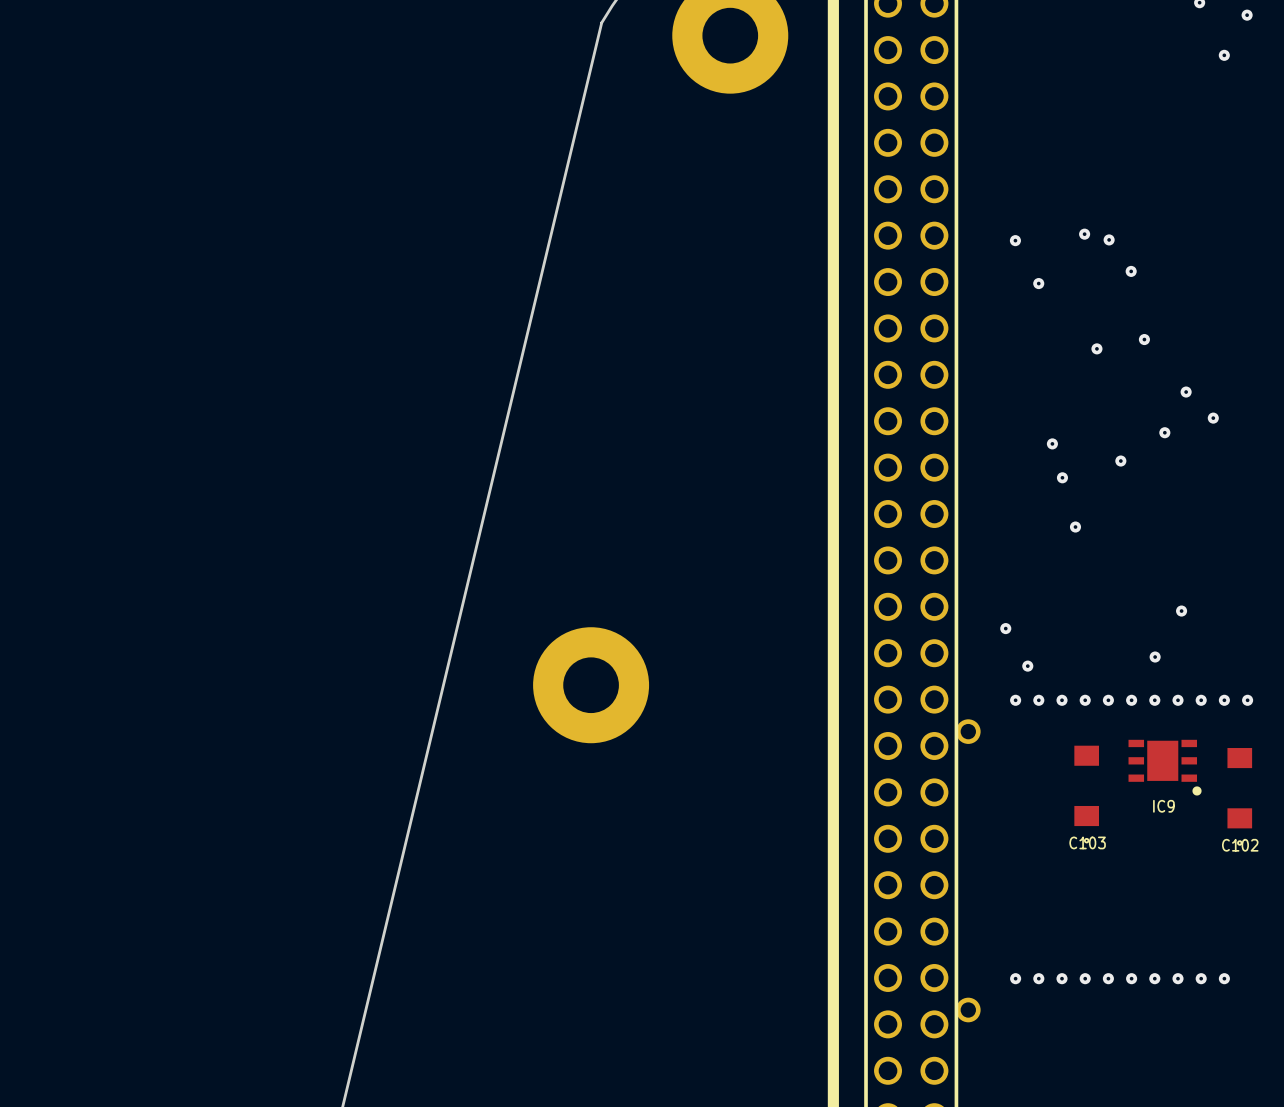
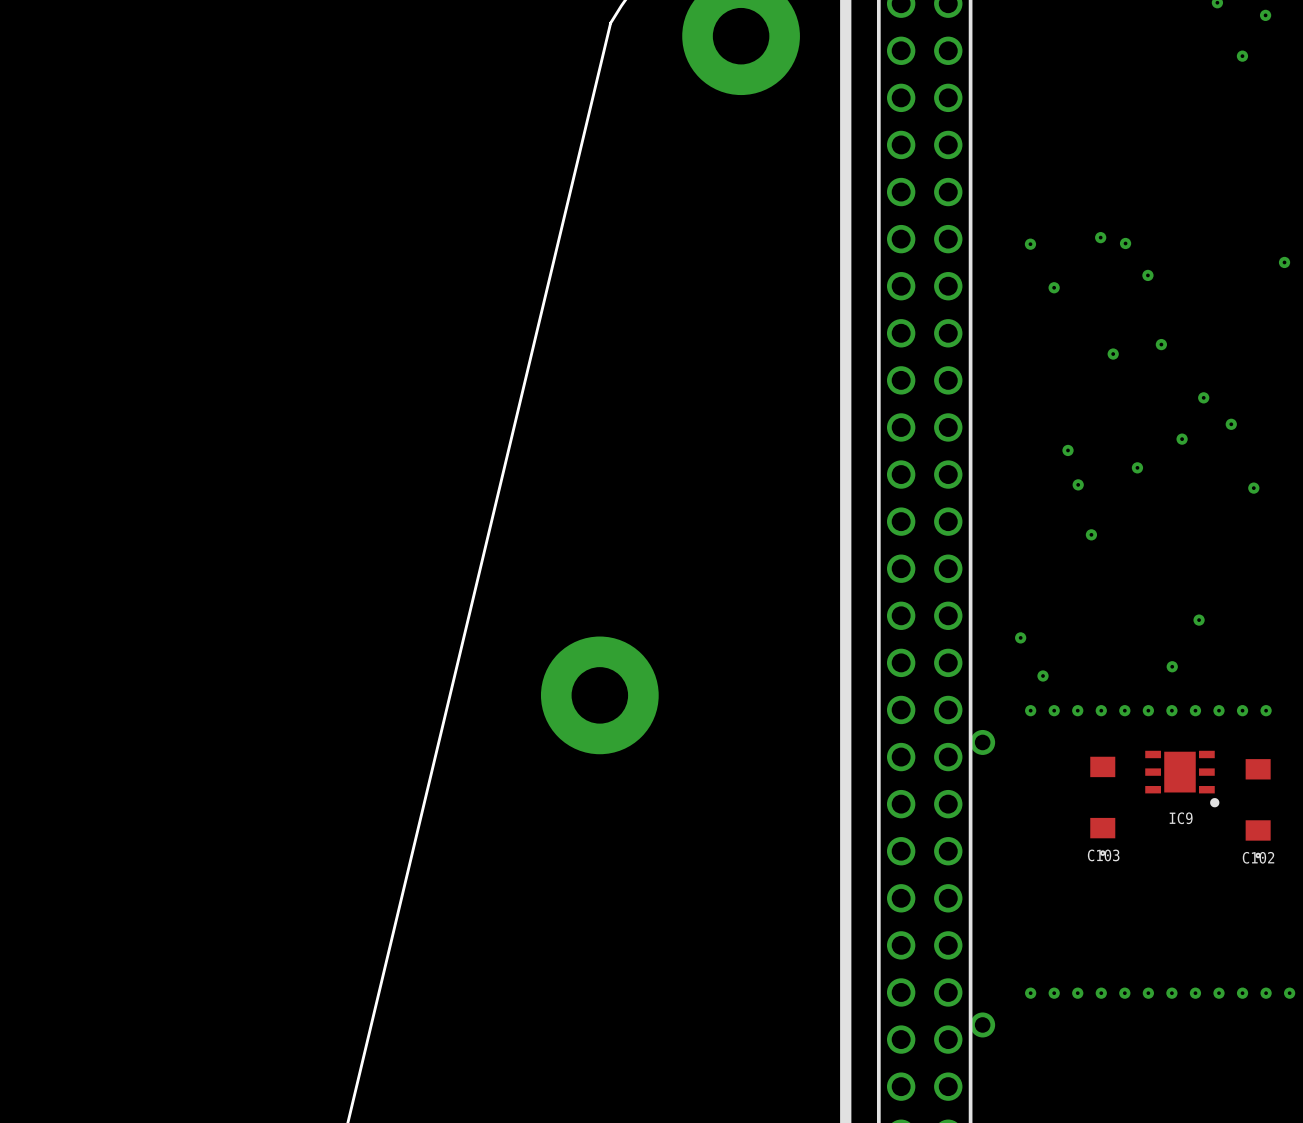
via: none -> (1284, 262)
via: none -> (1253, 488)
via: none -> (1266, 993)
via: none -> (1289, 993)

